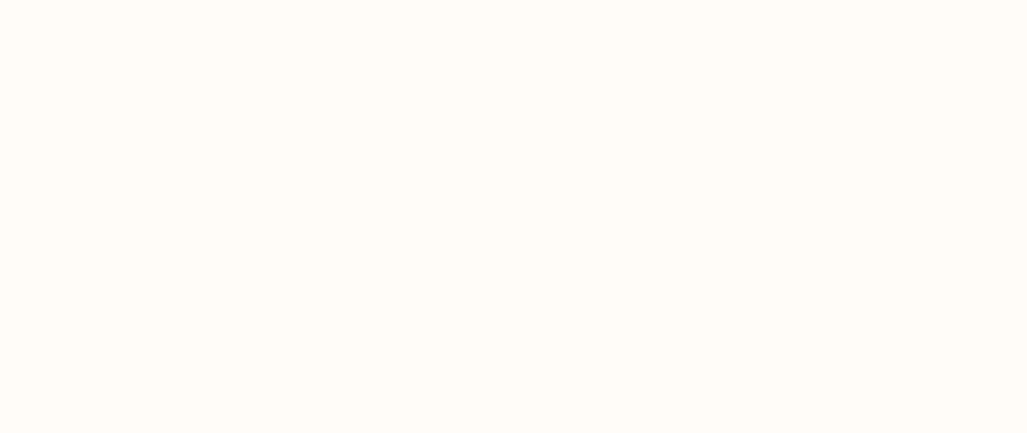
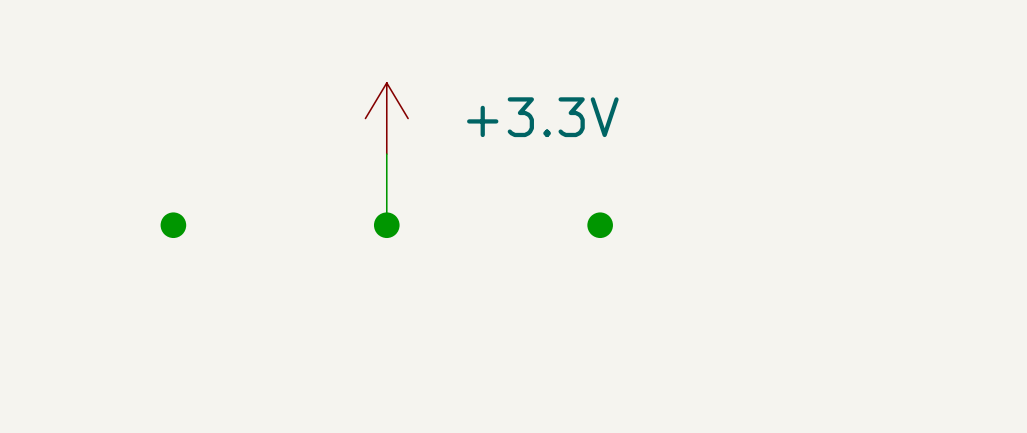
power symbol: none -> +3.3V (386, 118)
wire: none -> (386, 154) (386, 225)
junction: none -> (173, 225)
junction: none -> (386, 225)
junction: none -> (600, 225)

